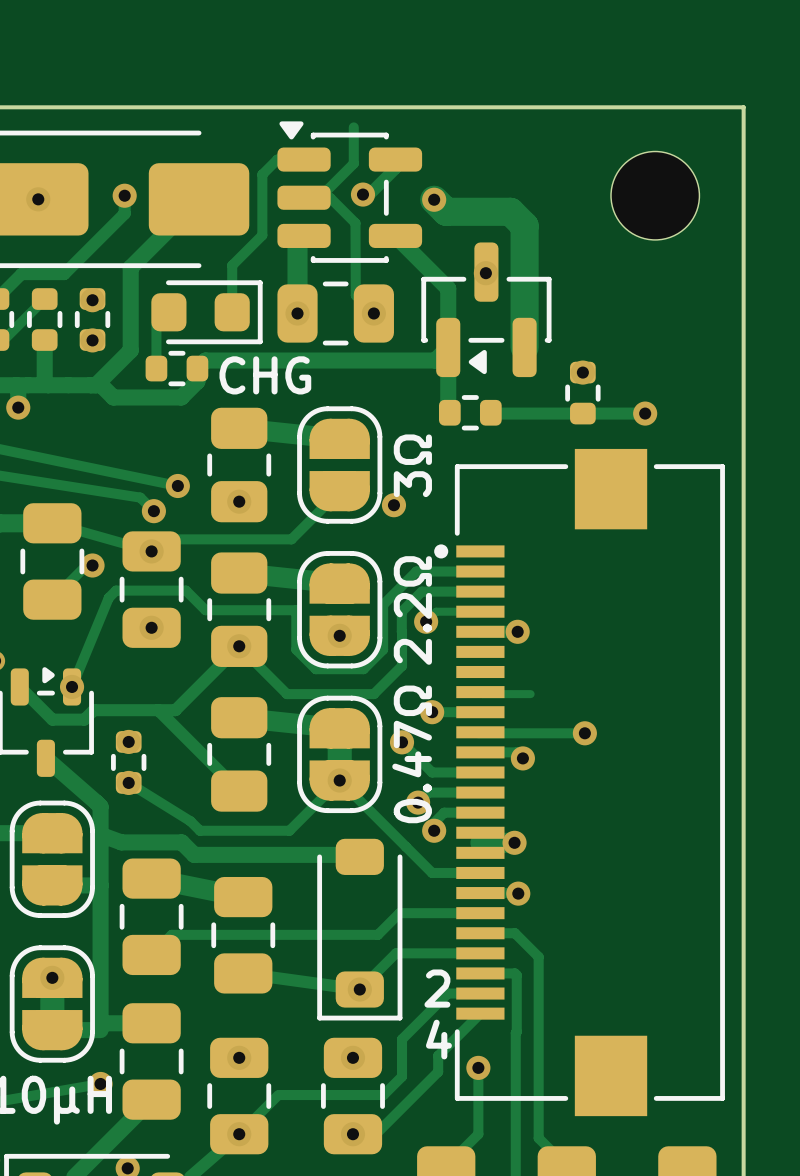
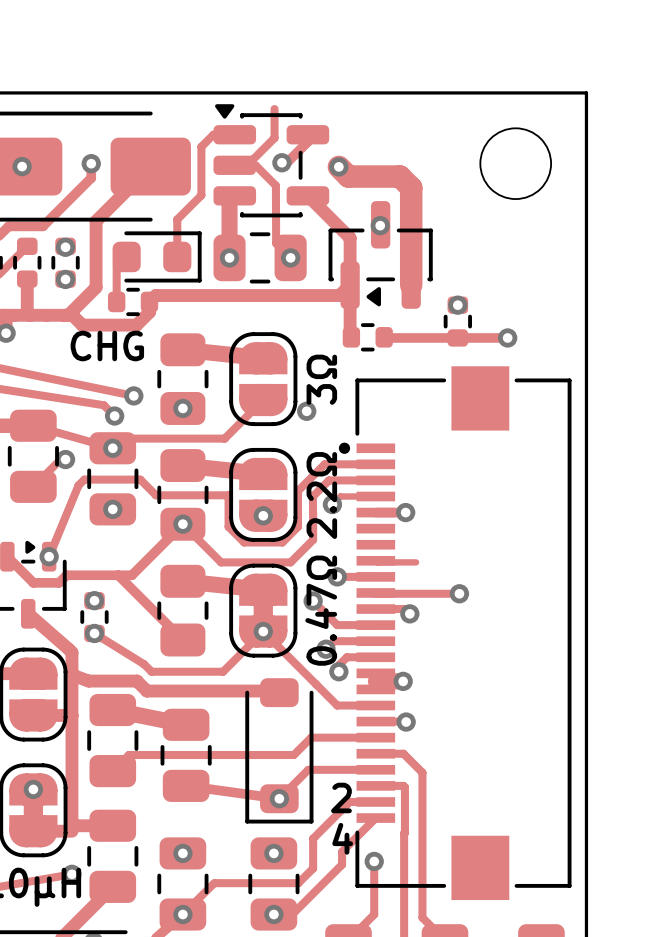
text position: CHG (265, 375) -> CHG (107, 346)

